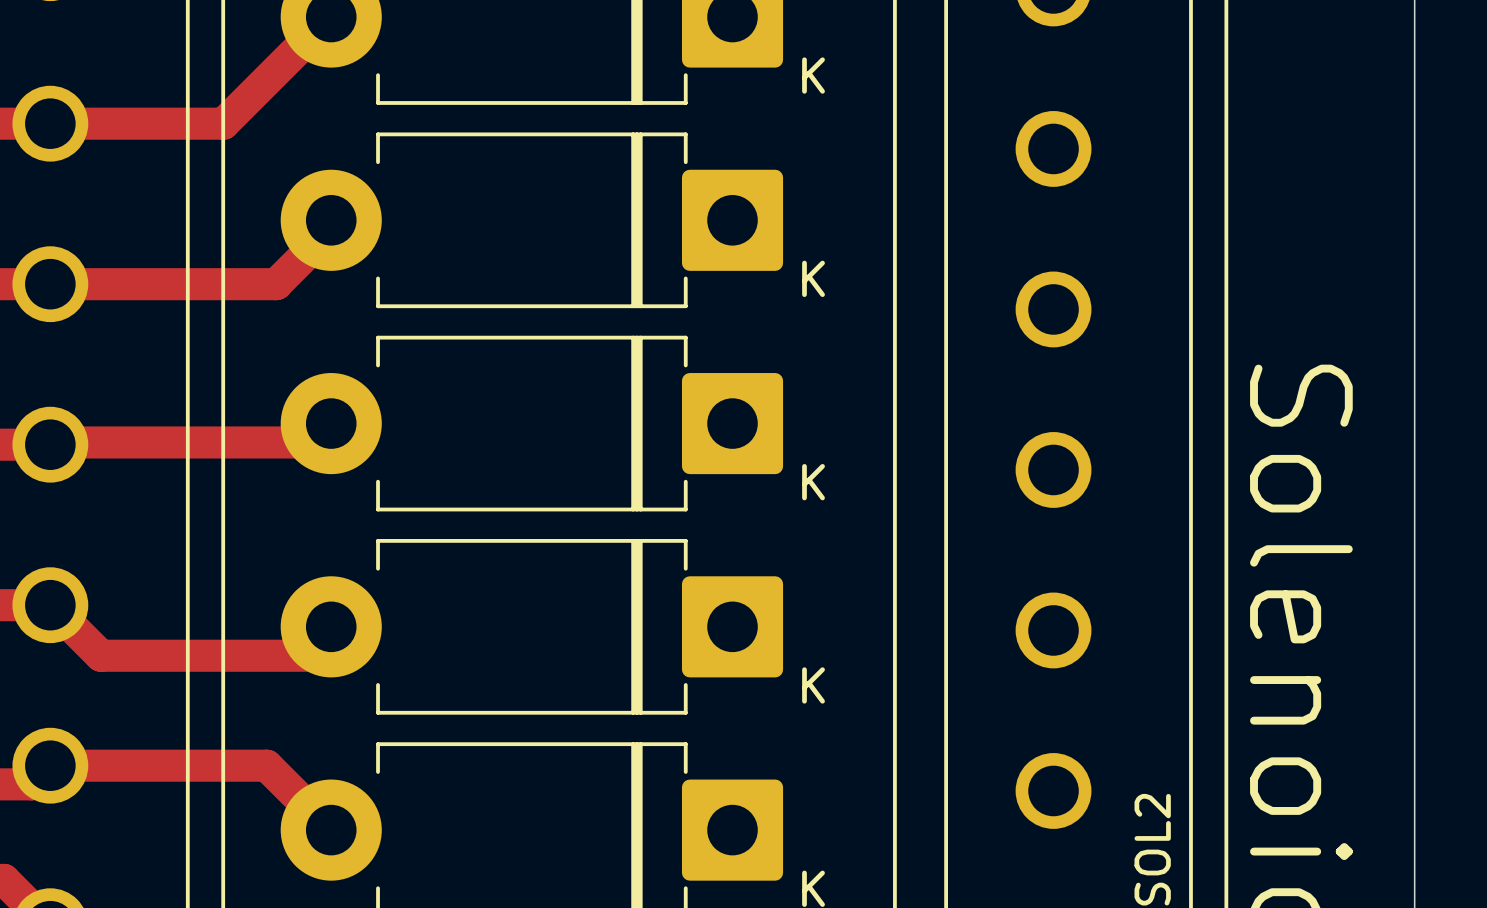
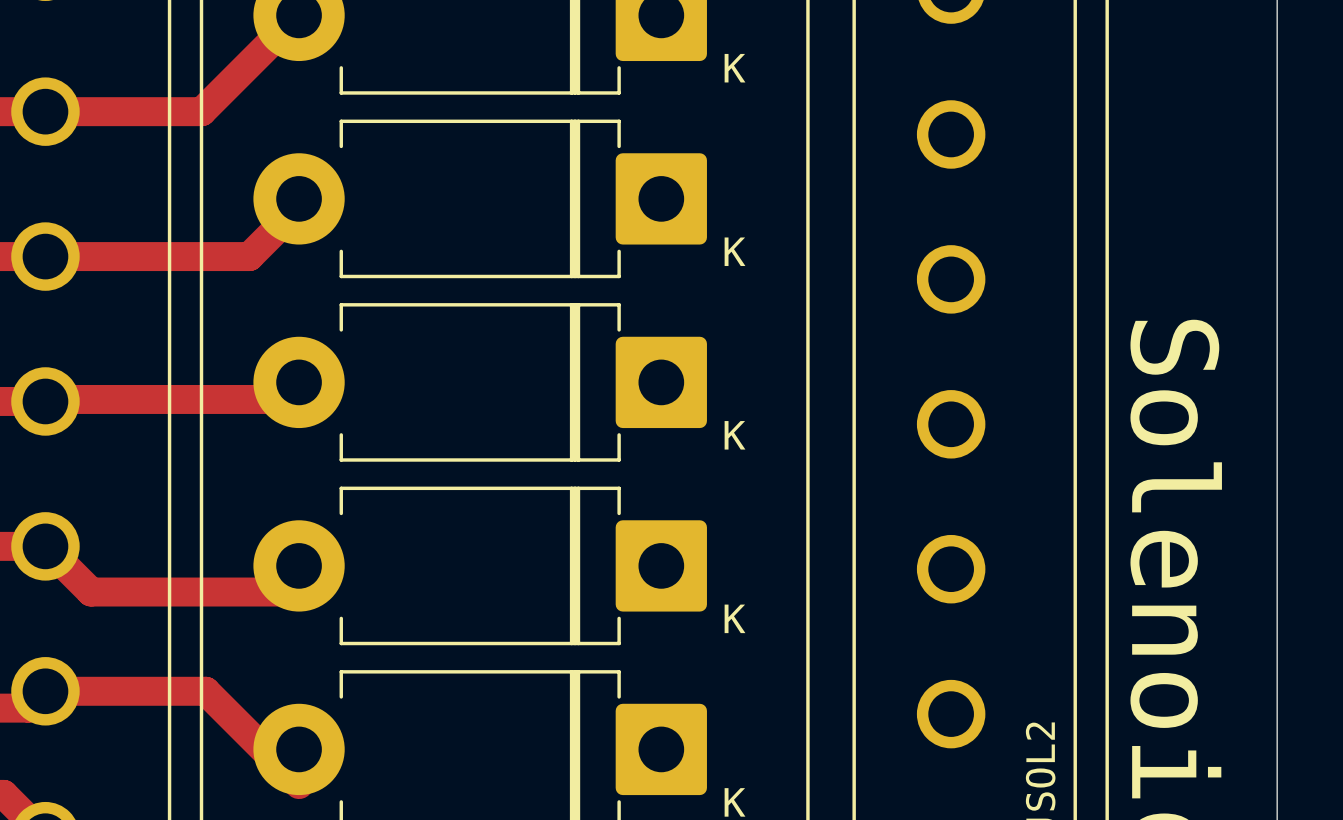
top track: (227, 765) (266, 765) (331, 830) -> (205, 691) (299, 784)

